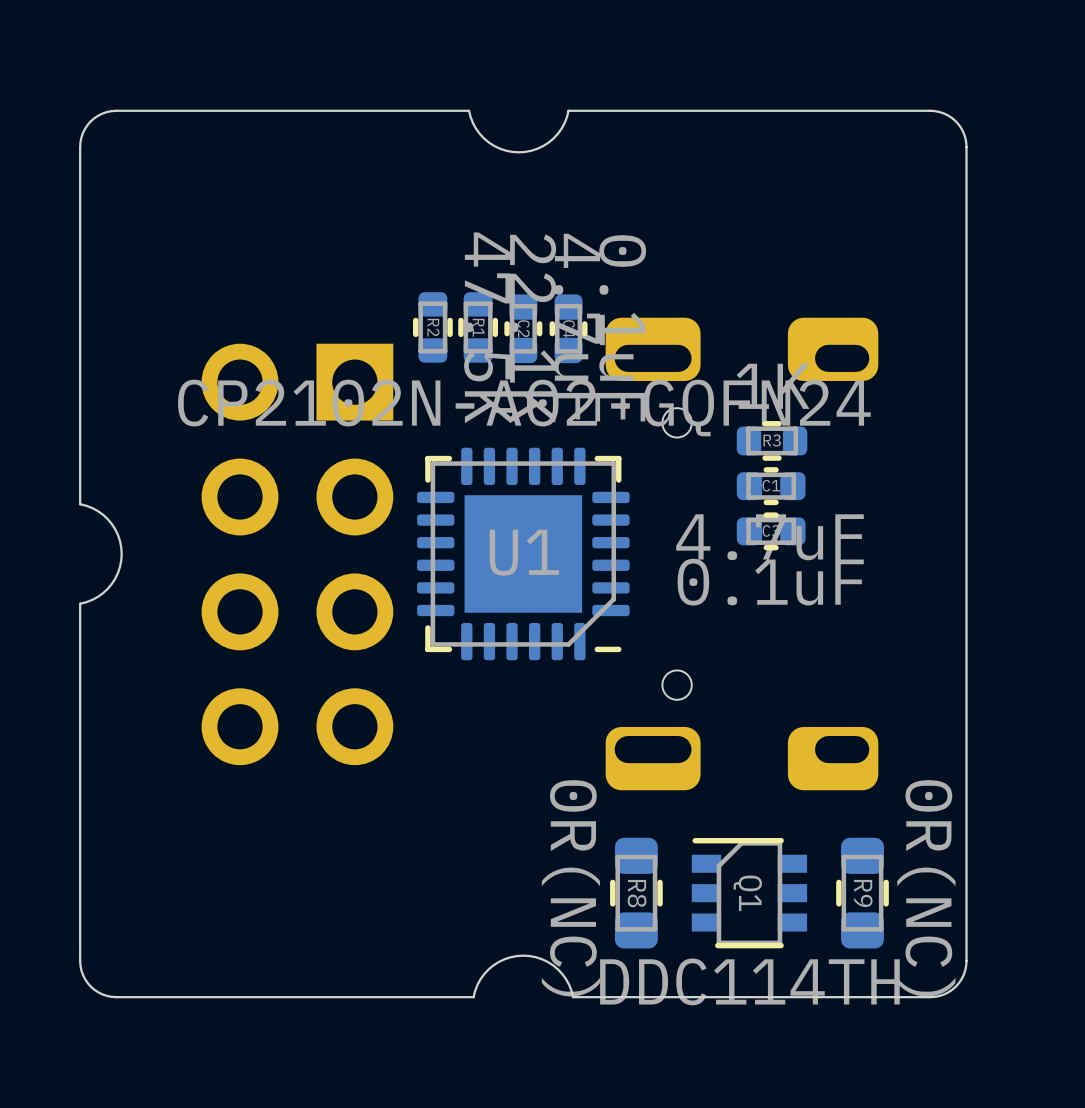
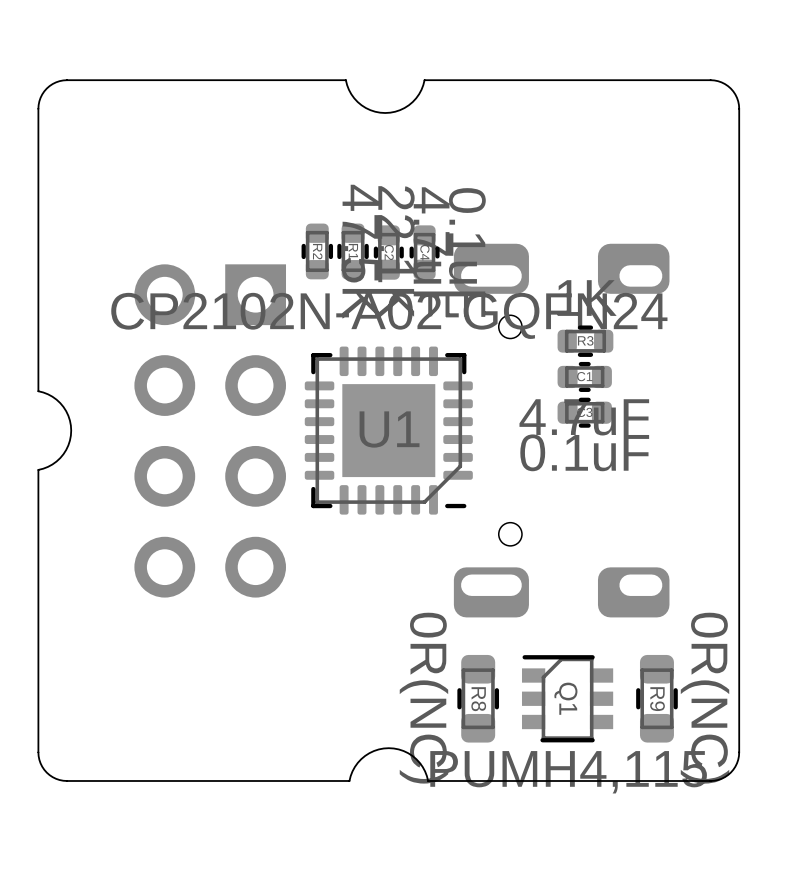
Q1 value: DDC114TH (749, 981) -> PUMH4,115 (568, 772)

